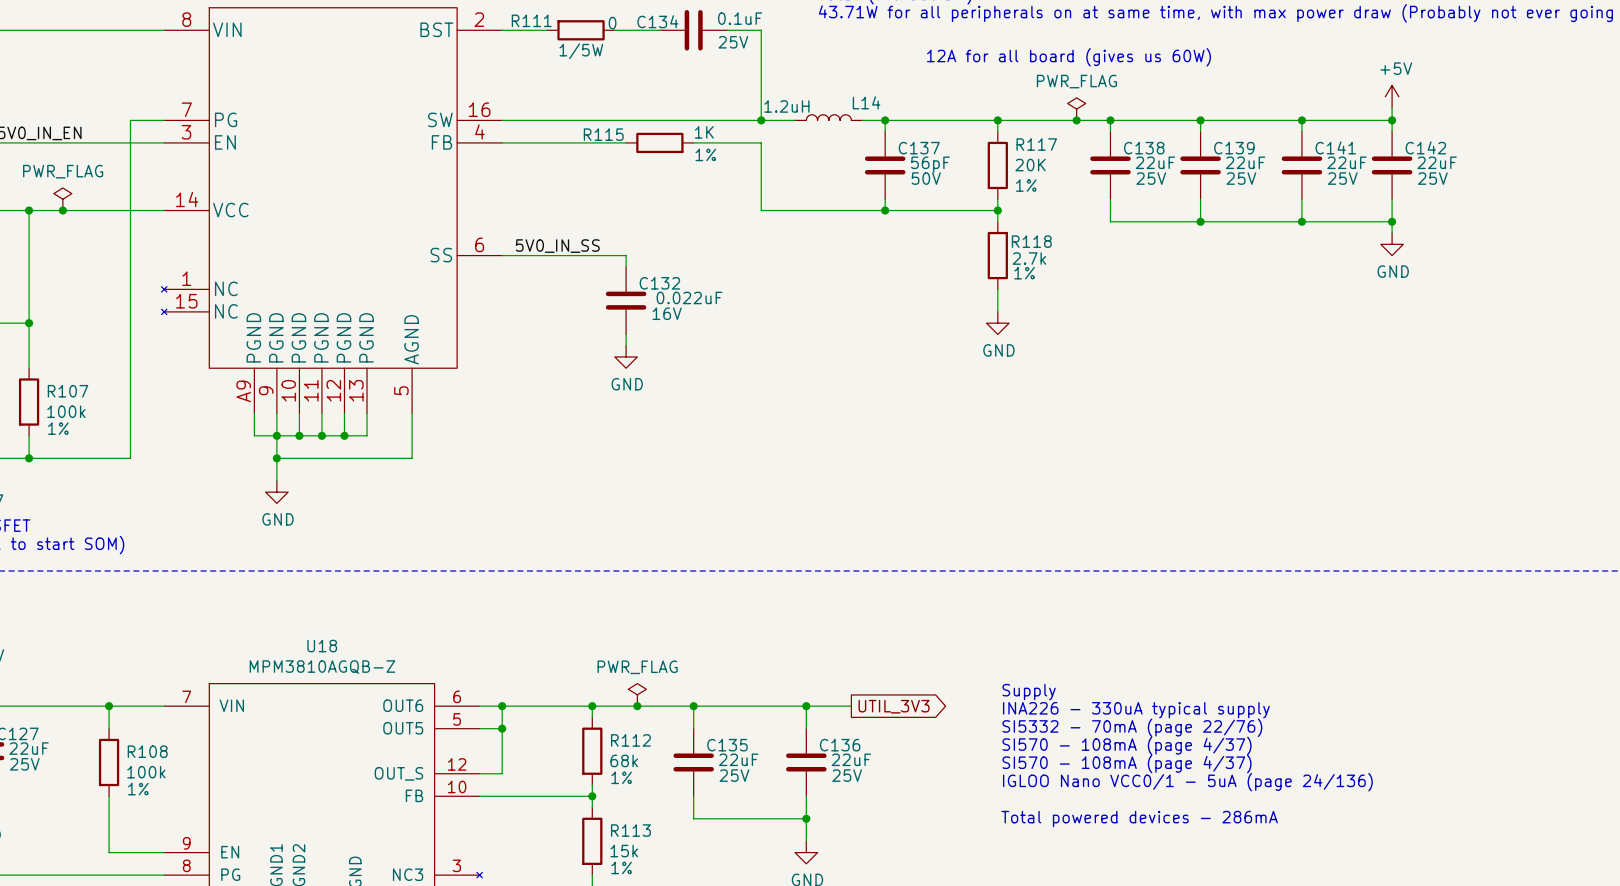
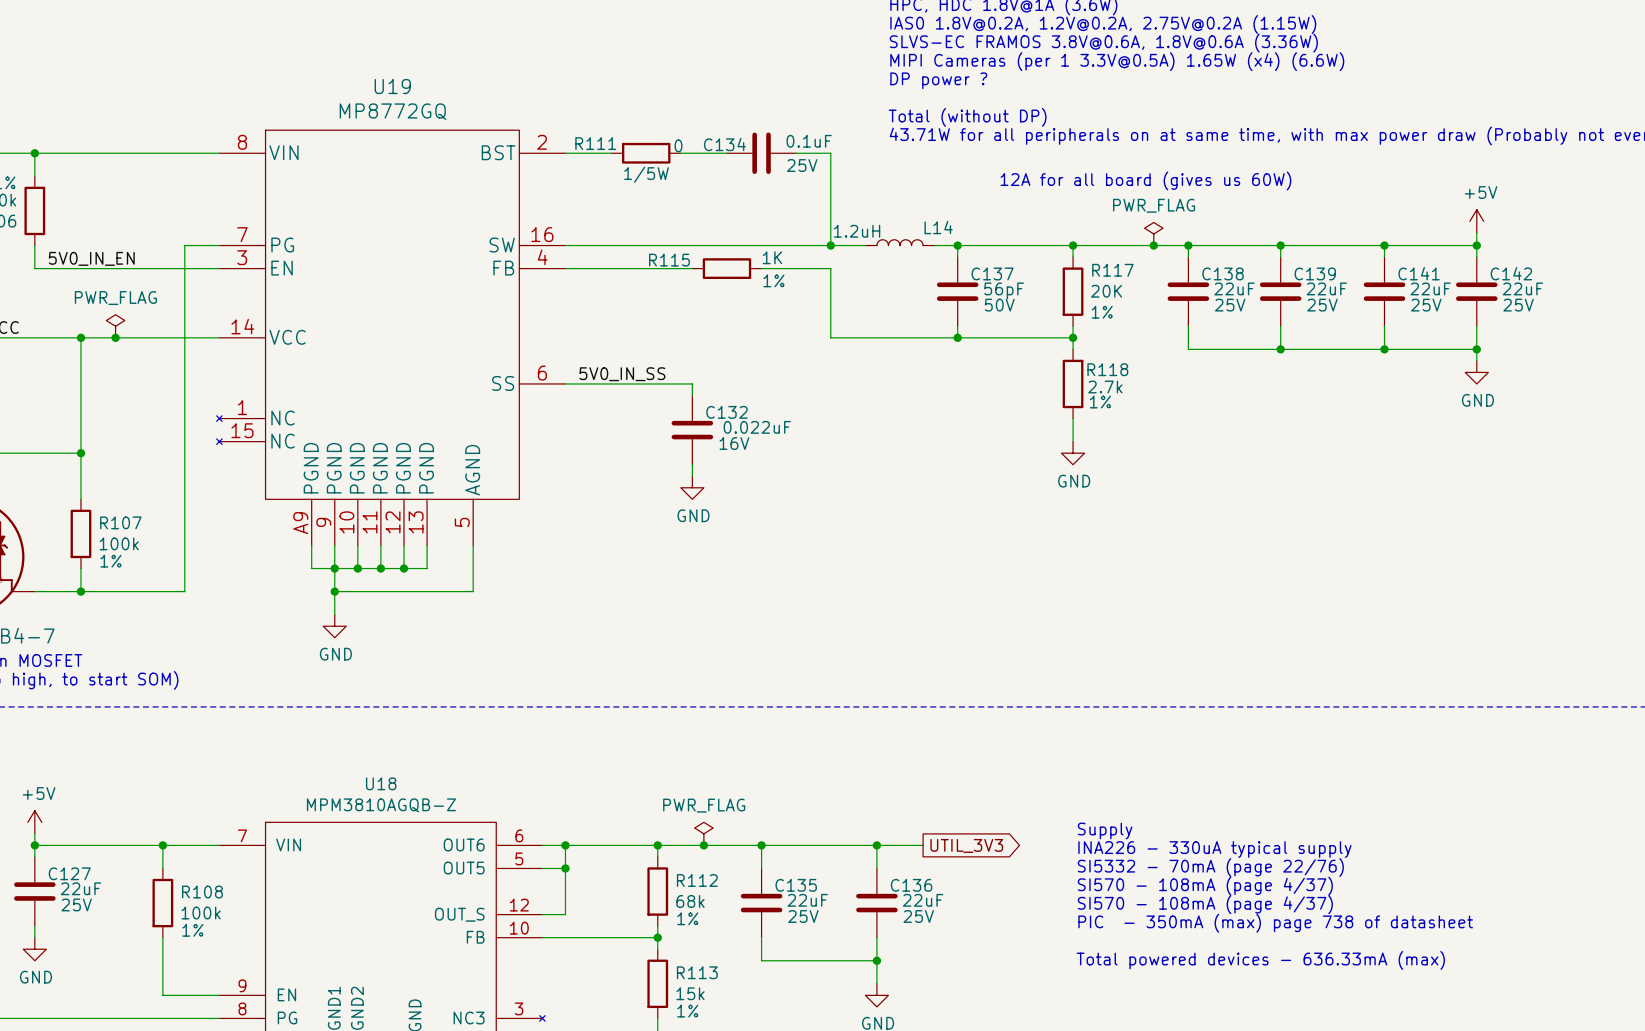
text: IGLOO Nano VCC0/1 - 5uA (page 24/136) (1187, 782) -> PIC - 350mA (max) page 738 of datasheet (1275, 923)
text: Total powered devices - 286mA (1139, 819) -> Total powered devices - 636.33mA (max) (1260, 960)

